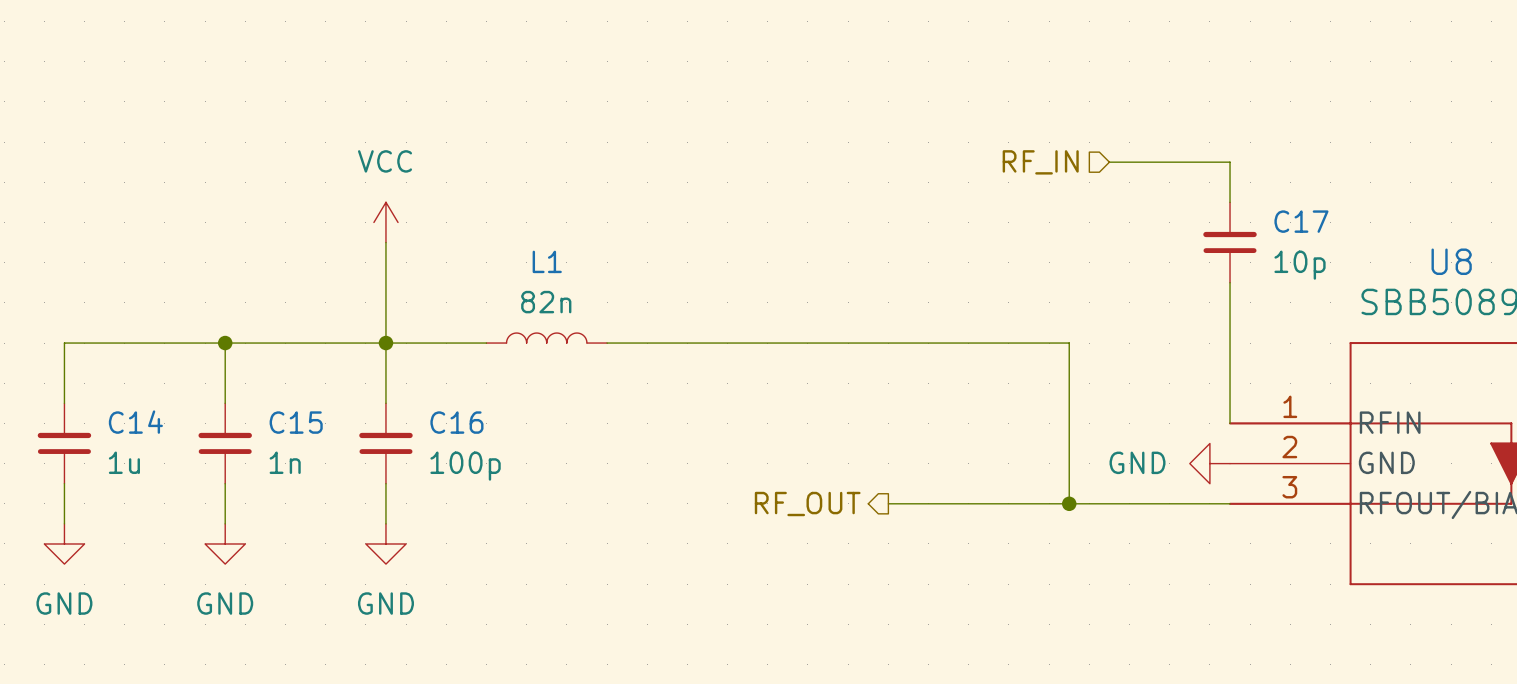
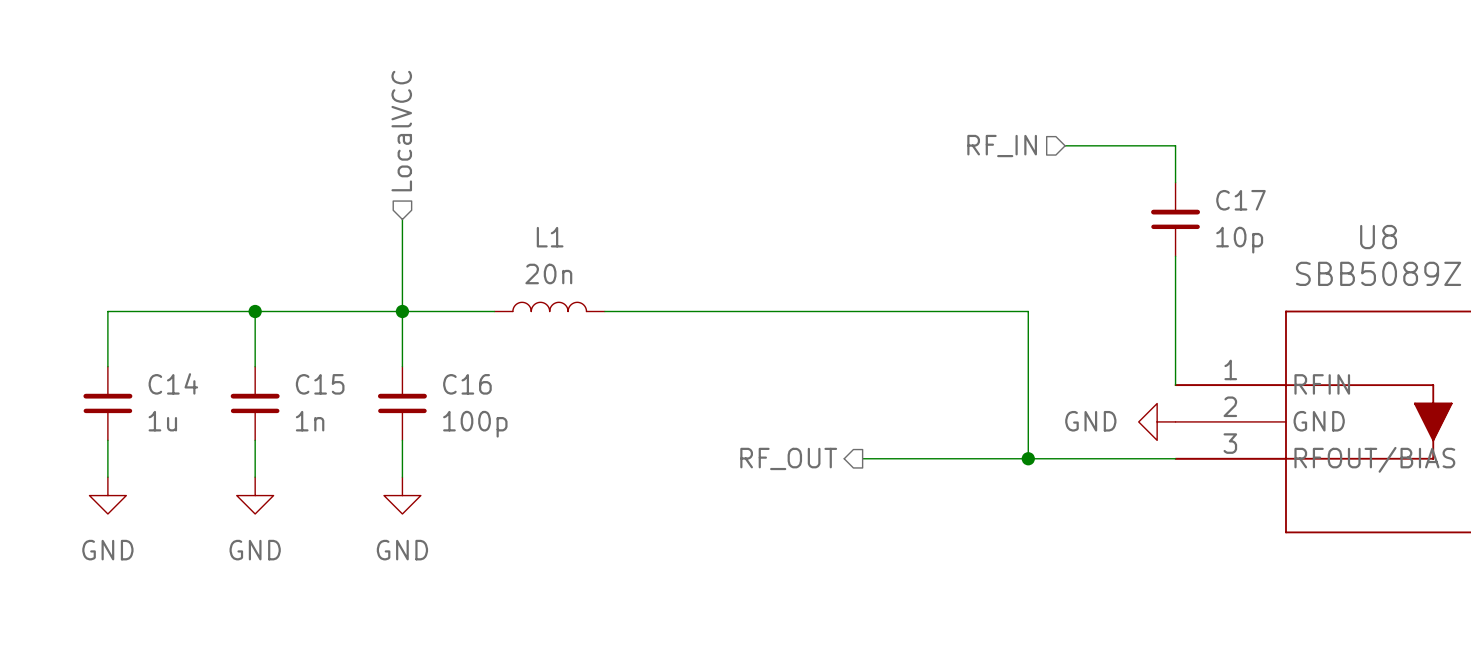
hierarchical label: none -> LocalVCC (401, 131)
power symbol: VCC (385, 222) -> none
L1 value: 82n (546, 302) -> 20n (548, 273)

